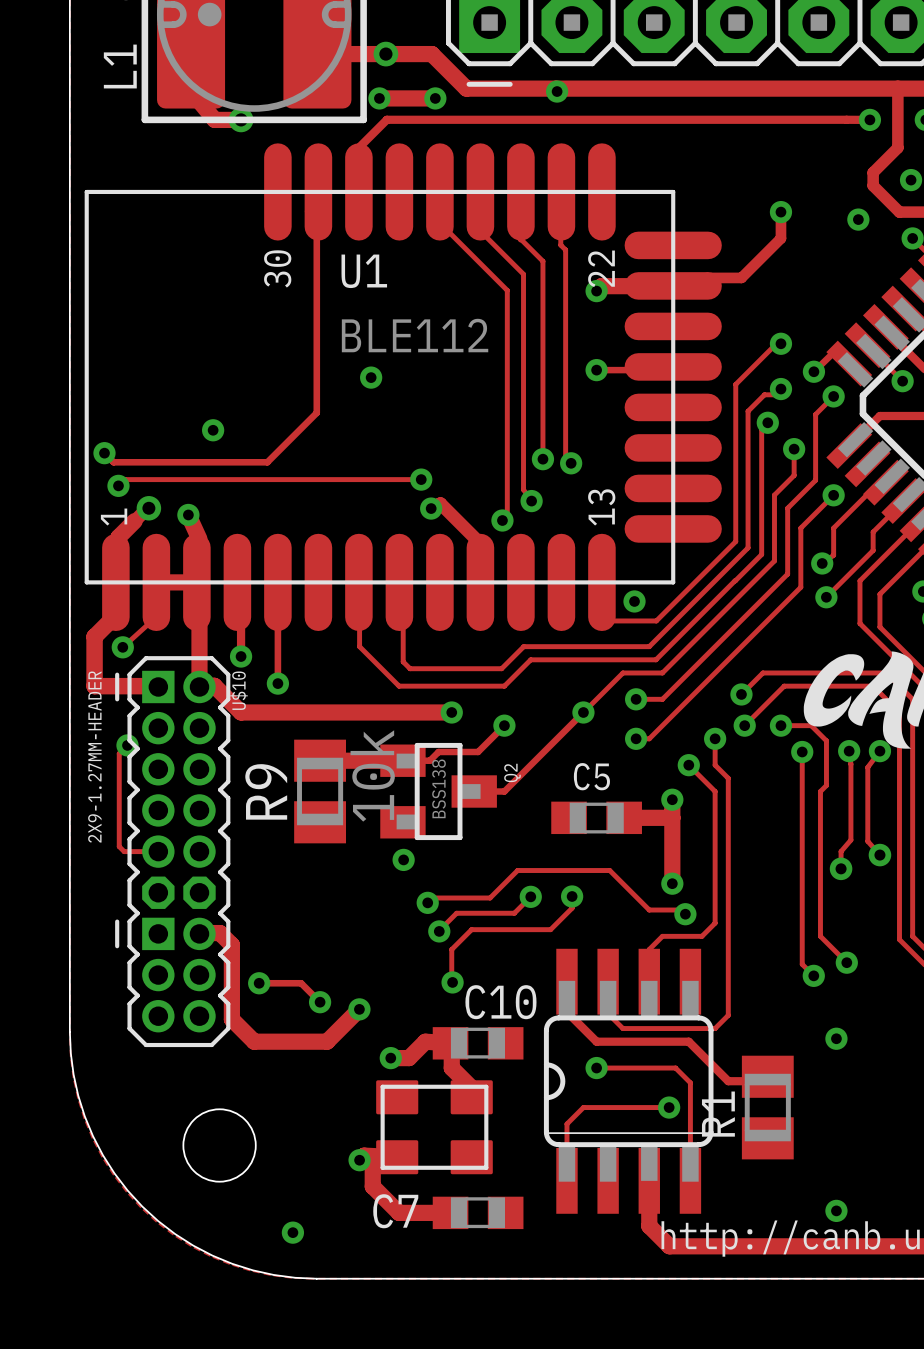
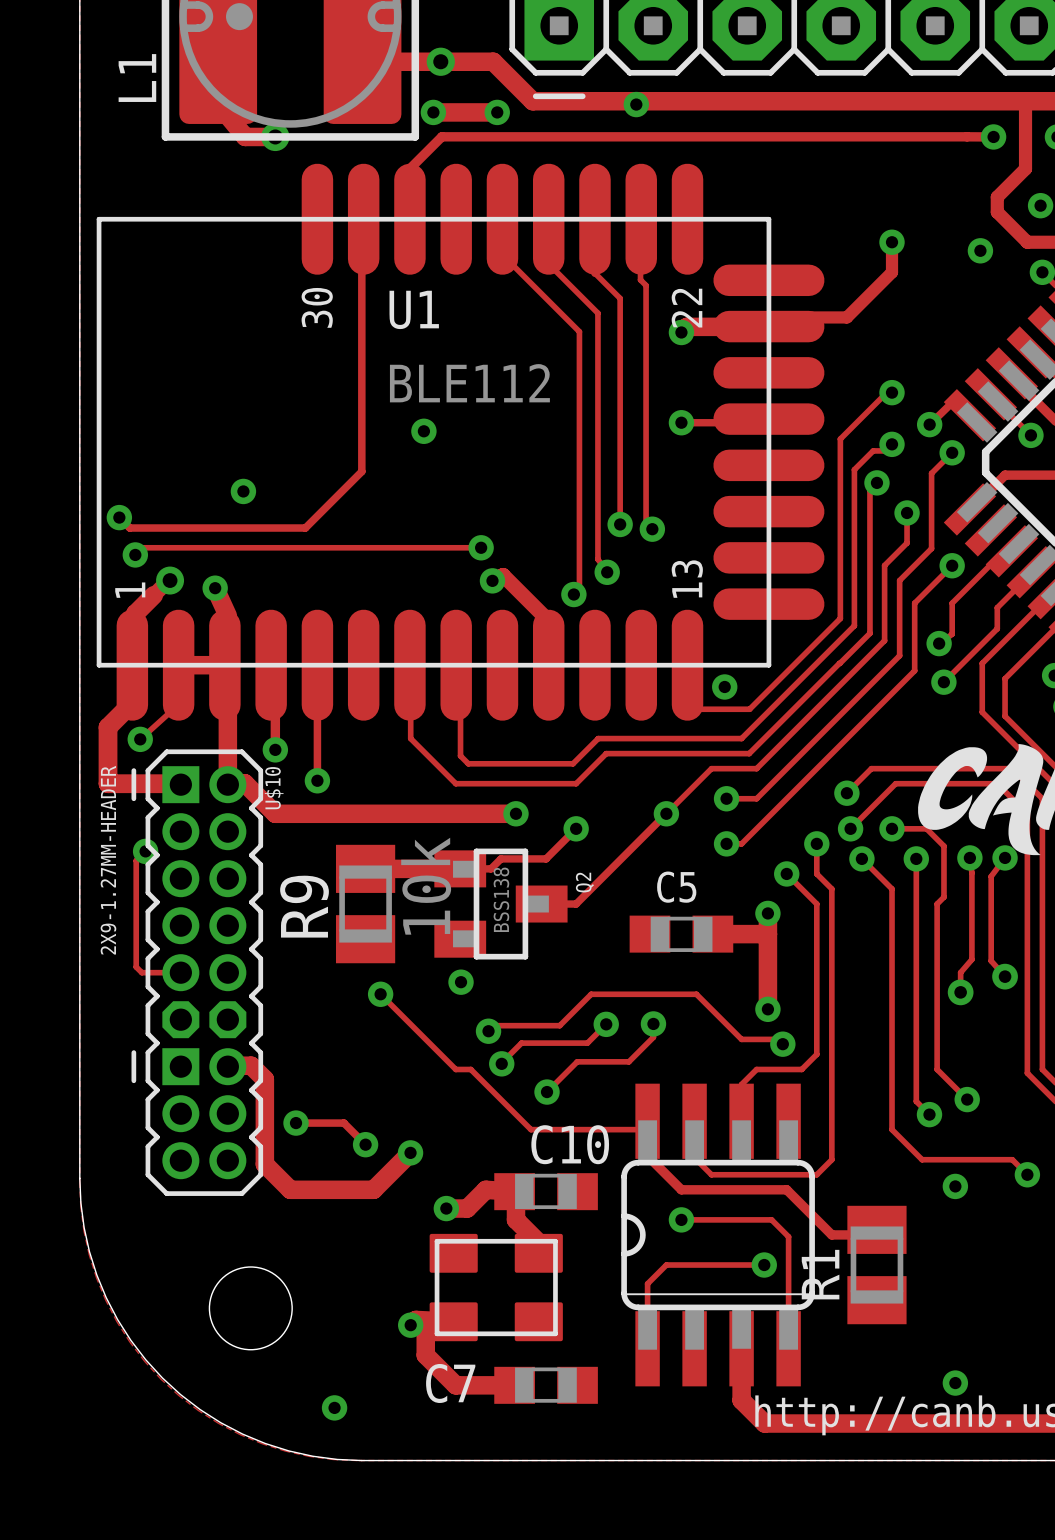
track: none -> (861, 858) (892, 888) (892, 1129) (922, 1159) (1012, 1159) (1027, 1174)
via: none -> (861, 858)
track: none -> (380, 994) (455, 1069) (470, 1069) (531, 1129) (639, 1129) (647, 1121)
via: none -> (380, 994)
track: (505, 929) (471, 929) (451, 949) (452, 982) -> (577, 1061) (547, 1092)
via position: (452, 982) -> (547, 1092)
via: none -> (1027, 1174)

